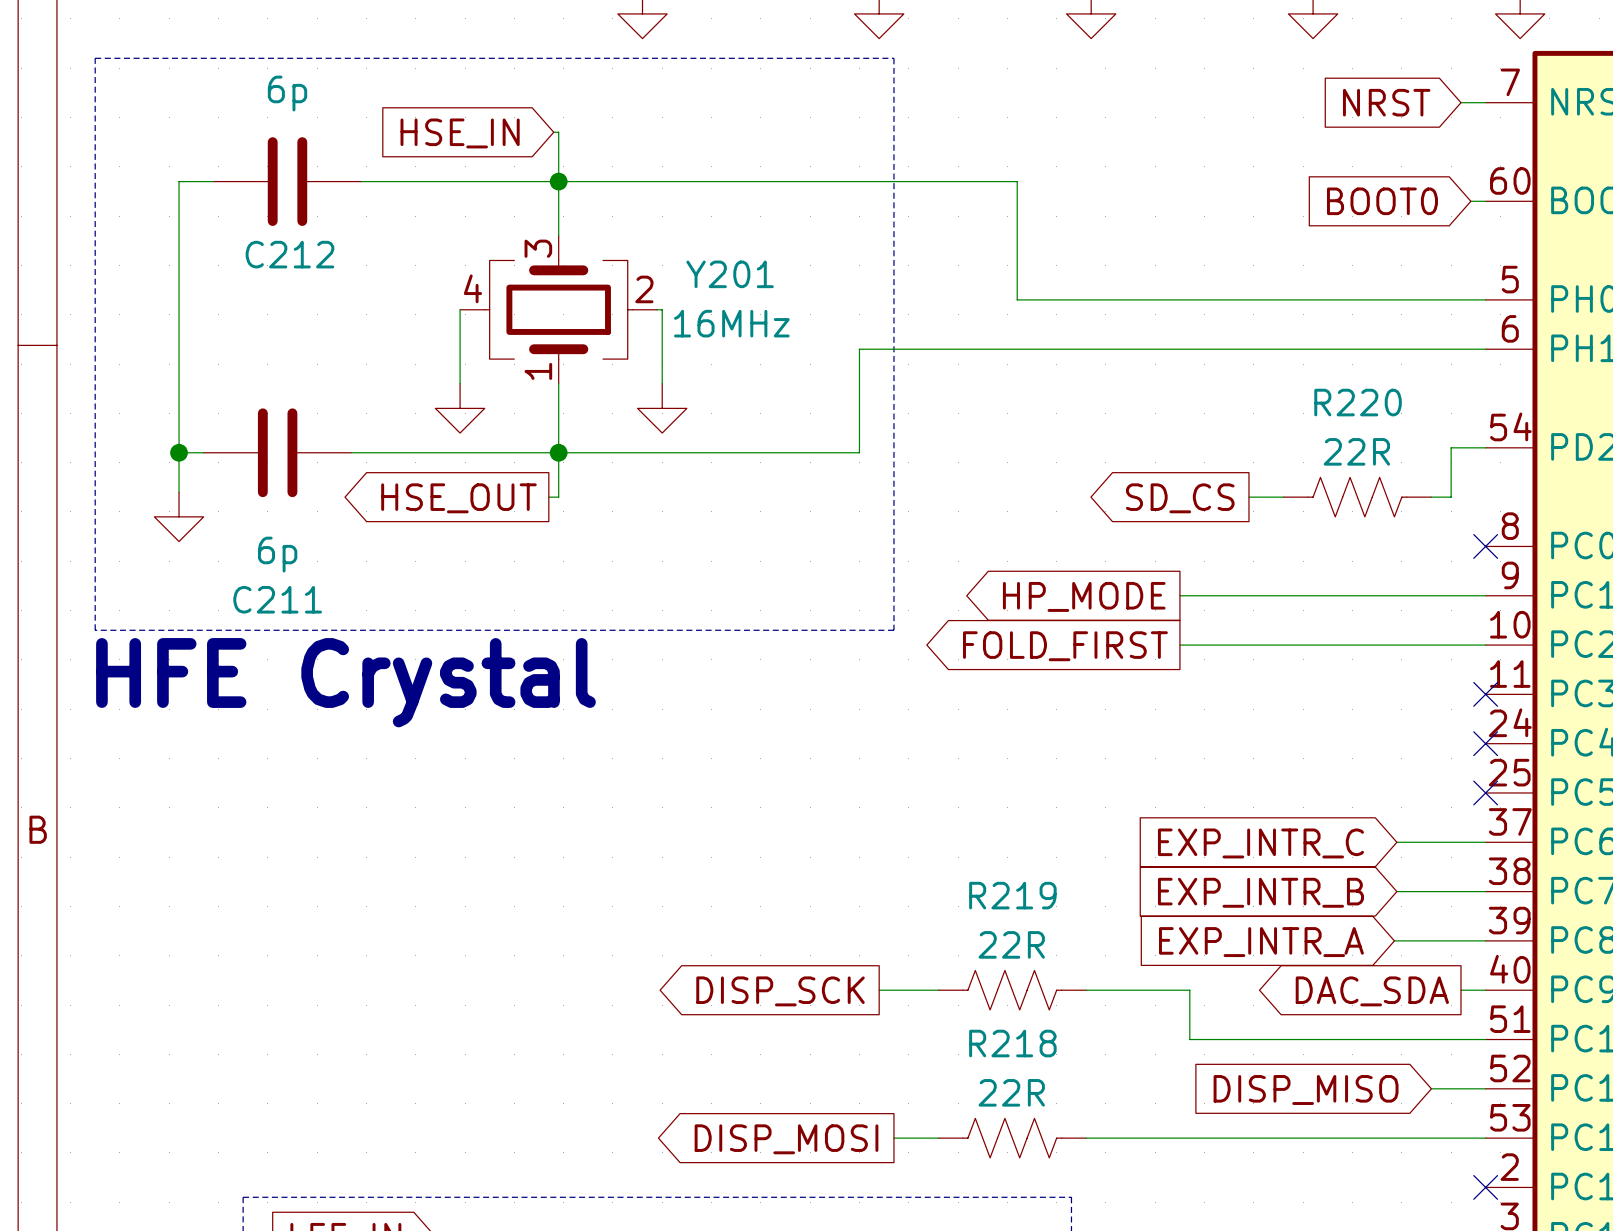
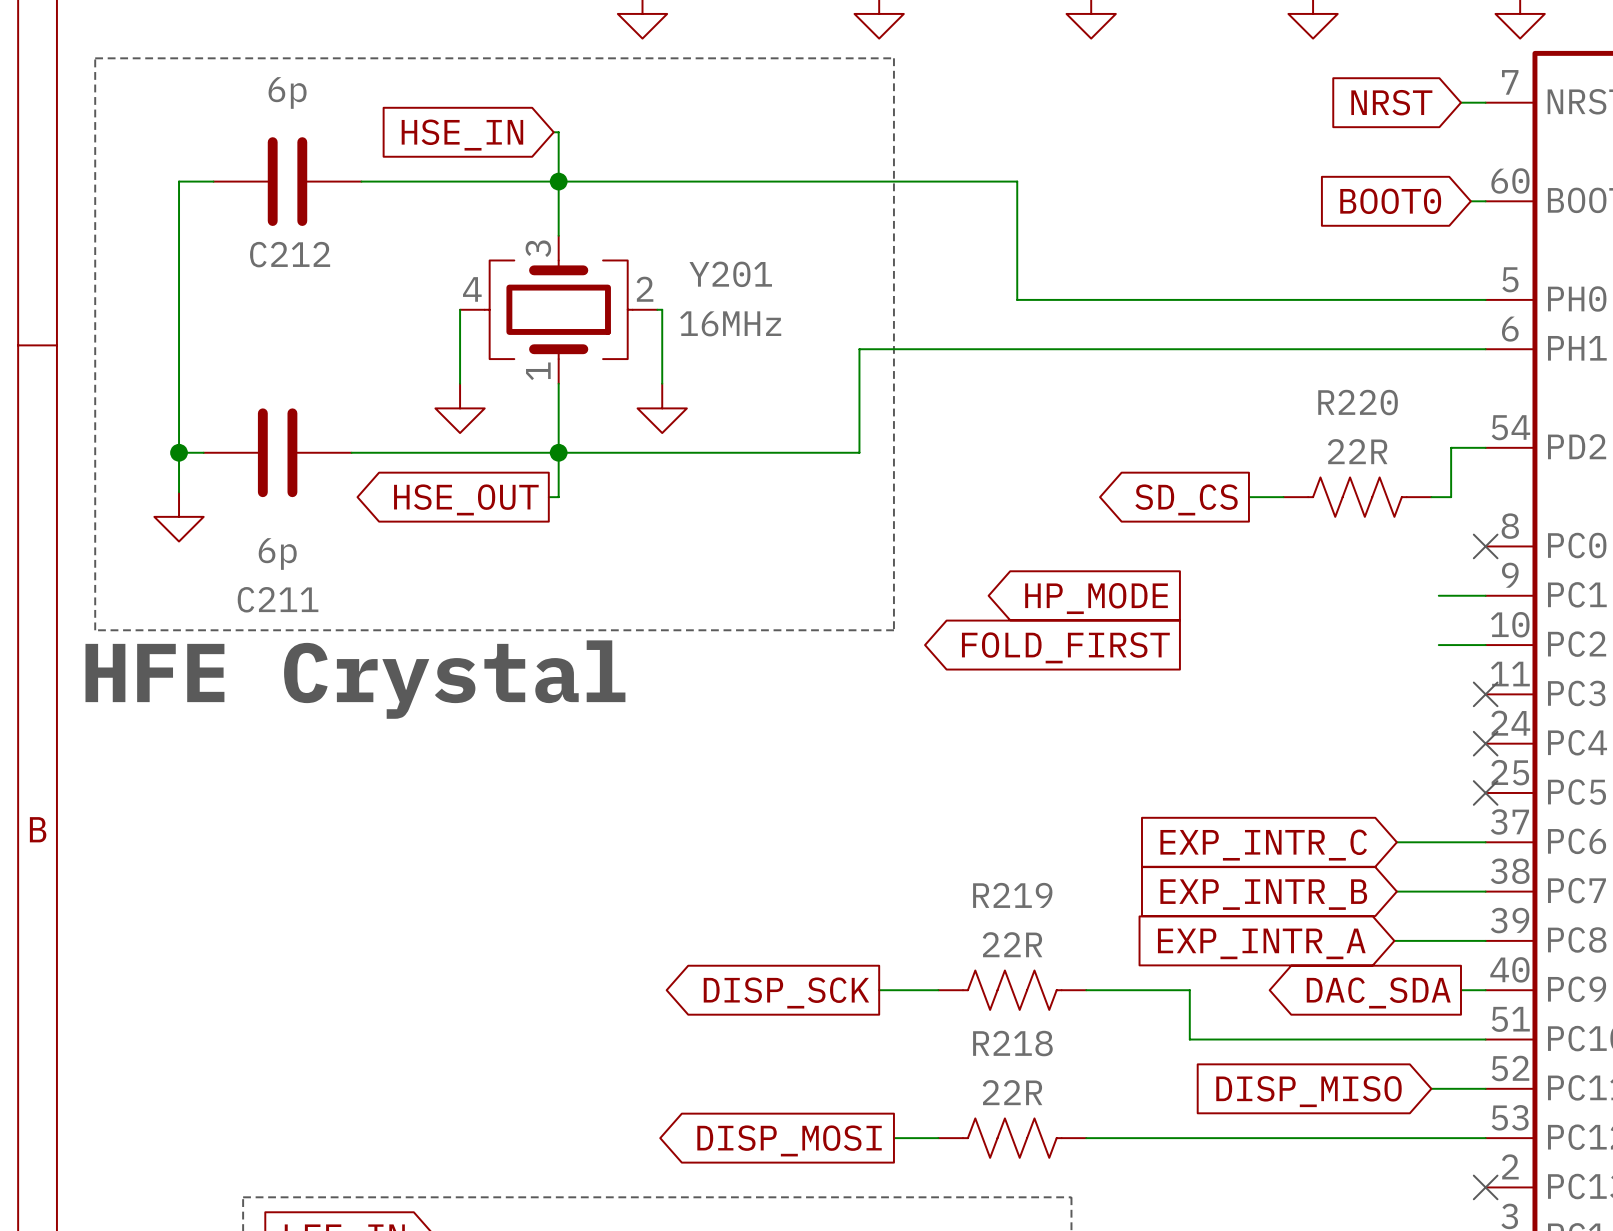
wire: (1179, 595) (1438, 595) -> none
wire: (1179, 645) (1438, 645) -> none

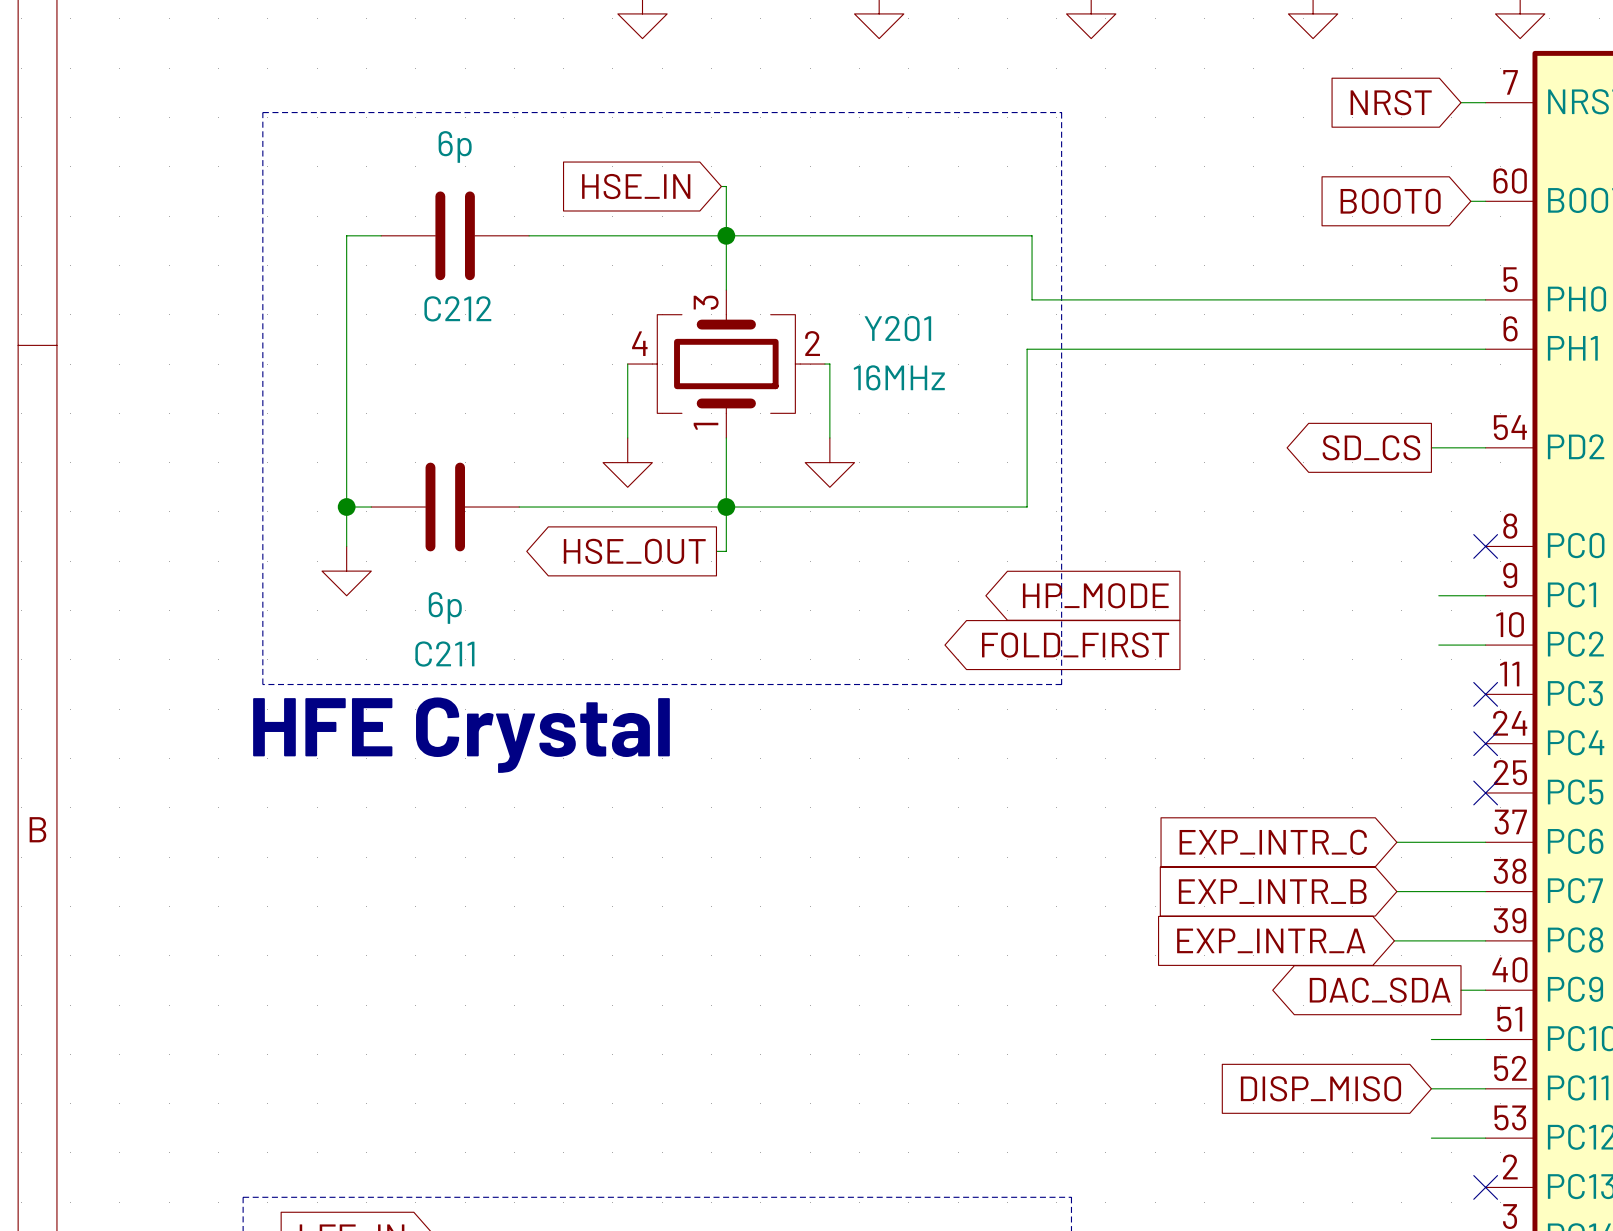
line: (95, 58) (893, 58) (893, 630) (95, 630) (95, 58) -> (262, 112) (1061, 112) (1061, 684) (262, 684) (262, 112)
wire: (553, 132) (558, 132) (558, 235) -> (721, 186) (726, 186) (726, 290)
global label position: HSE_IN (462, 135) -> HSE_IN (636, 186)
wire: (213, 181) (179, 181) (179, 492) -> (381, 235) (346, 235) (346, 546)
C212 position: (287, 181) -> (455, 235)
wire: (361, 181) (1017, 181) (1017, 299) (1032, 299) -> (529, 235) (1032, 235) (1032, 299)
junction: (558, 181) -> none
junction: none -> (726, 235)
wire: (460, 309) (460, 383) -> (627, 364) (627, 437)
Y201 position: (558, 309) -> (726, 364)
wire: (657, 309) (662, 309) (662, 383) -> (824, 364) (829, 364) (829, 437)
wire: (1027, 349) (859, 349) (859, 452) (351, 452) -> (1027, 349) (1027, 507) (519, 507)
wire: (558, 383) (558, 497) (548, 497) -> (726, 437) (726, 551) (716, 551)
power symbol: (460, 408) -> none
power symbol position: (662, 408) -> (627, 462)
wire: (1451, 447) (1451, 497) (1431, 497) -> (1451, 447) (1431, 447)
wire: (179, 452) (203, 452) -> (346, 507) (371, 507)
junction: (179, 452) -> none
C211 position: (277, 452) -> (445, 507)
junction: (558, 452) -> none
power symbol: none -> (829, 462)
wire: (1248, 497) (1283, 497) -> none
R220: 22R (1357, 497) -> none
global label position: HSE_OUT (466, 499) -> HSE_OUT (634, 551)
global label position: SD_CS (1186, 499) -> SD_CS (1371, 447)
junction: none -> (346, 507)
junction: none -> (726, 507)
power symbol: (179, 516) -> none
power symbol: none -> (346, 571)
text position: HFE Crystal (355, 679) -> HFE Crystal (461, 735)
wire: (879, 990) (938, 990) -> none
R219: 22R (1012, 990) -> none
wire: (1086, 990) (1189, 990) (1189, 1039) (1431, 1039) -> none
global label: DISP_SCK (786, 992) -> none
wire: (893, 1138) (938, 1138) -> none
R218: 22R (1012, 1138) -> none
wire: (1086, 1138) (1431, 1138) -> none
global label: DISP_MOSI (789, 1140) -> none

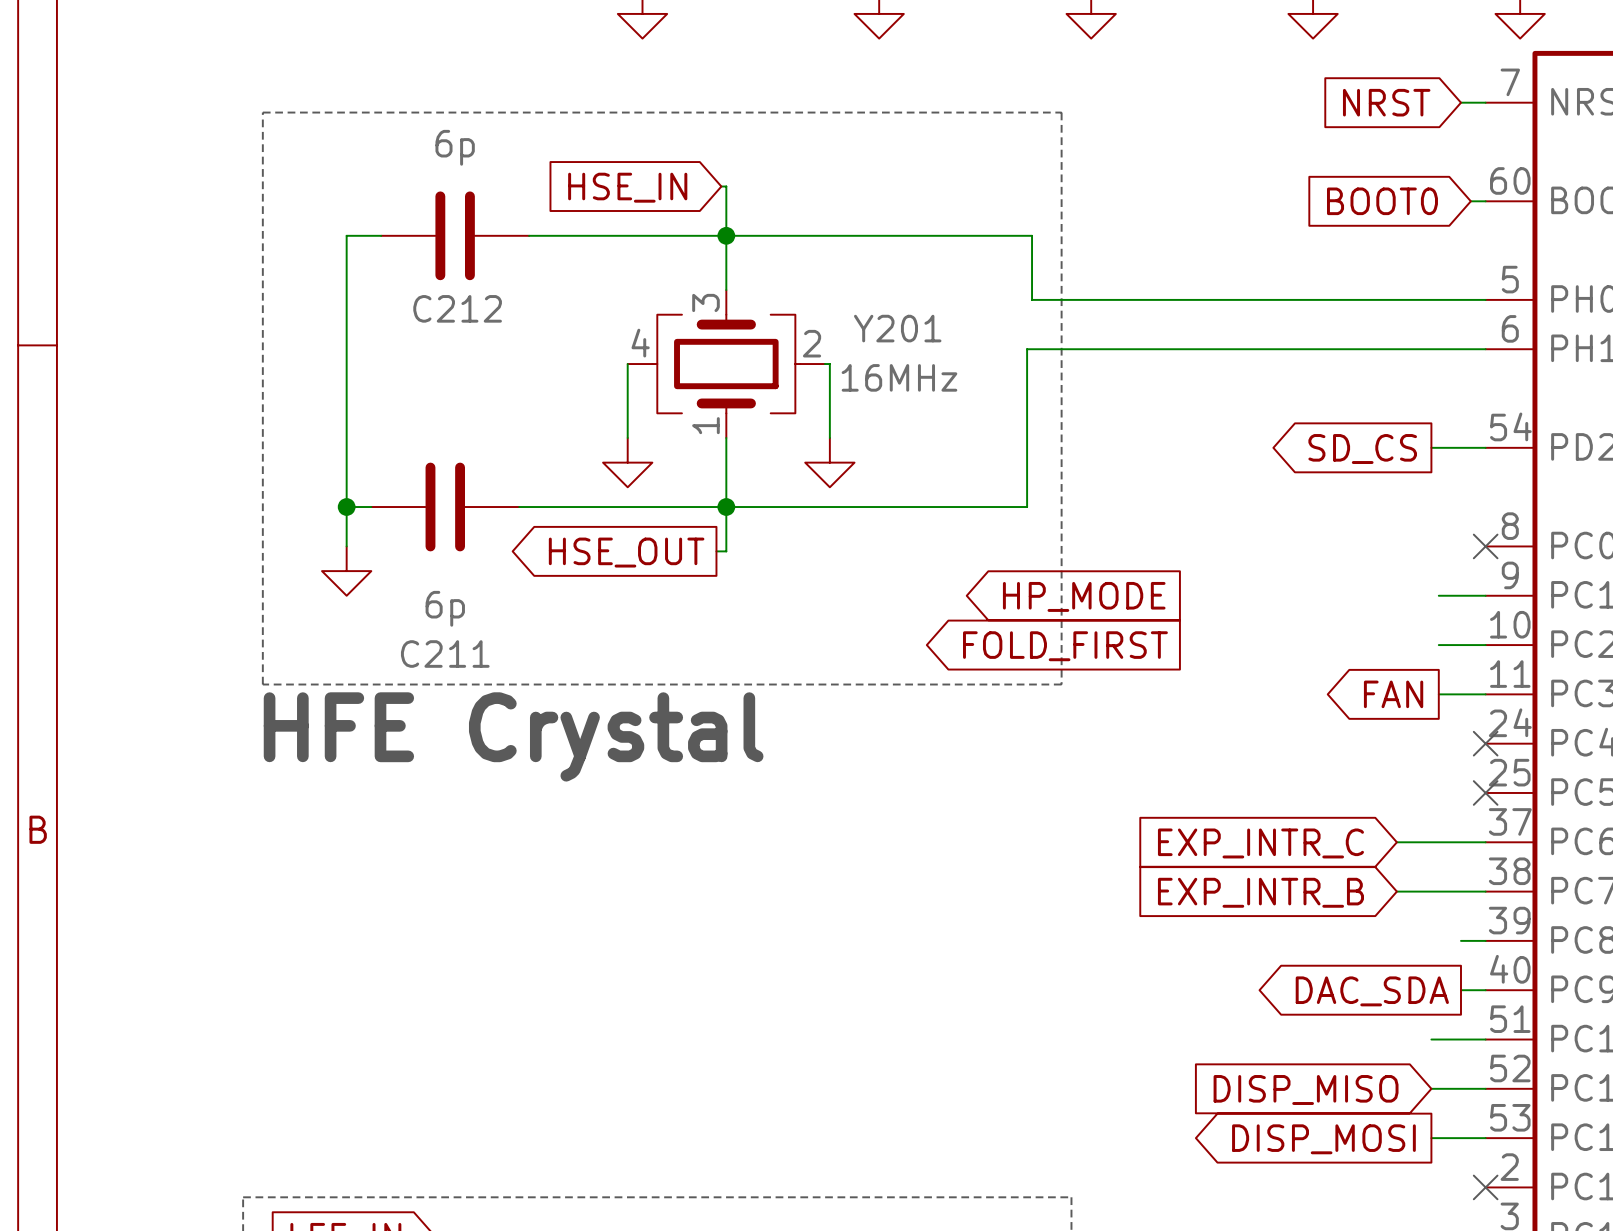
global label: none -> FAN (1393, 694)
wire: none -> (1438, 694) (1485, 694)
no-connect mark: (1485, 694) -> none
global label: EXP_INTR_A (1271, 940) -> none
wire: (1394, 940) (1460, 940) -> none
global label: none -> DISP_MOSI (1323, 1139)

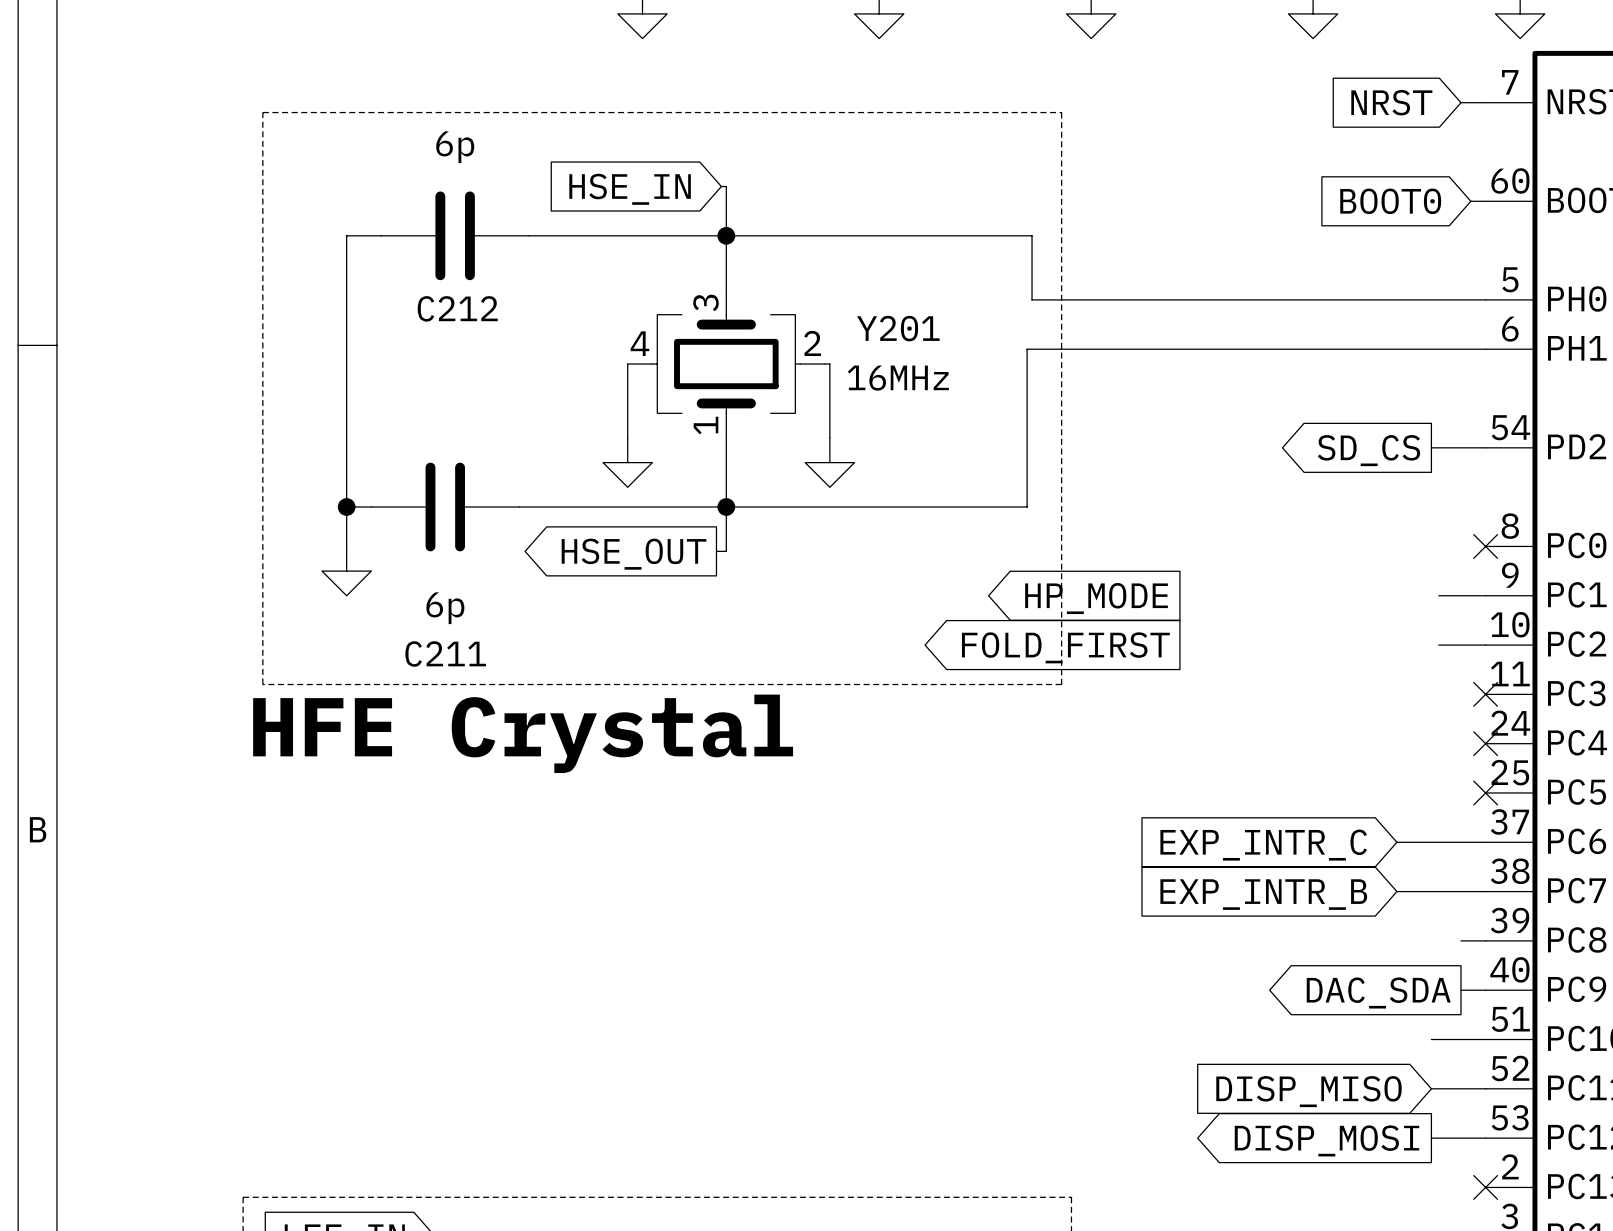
global label: FAN (1393, 694) -> none
wire: (1438, 694) (1485, 694) -> none
no-connect mark: none -> (1485, 694)

